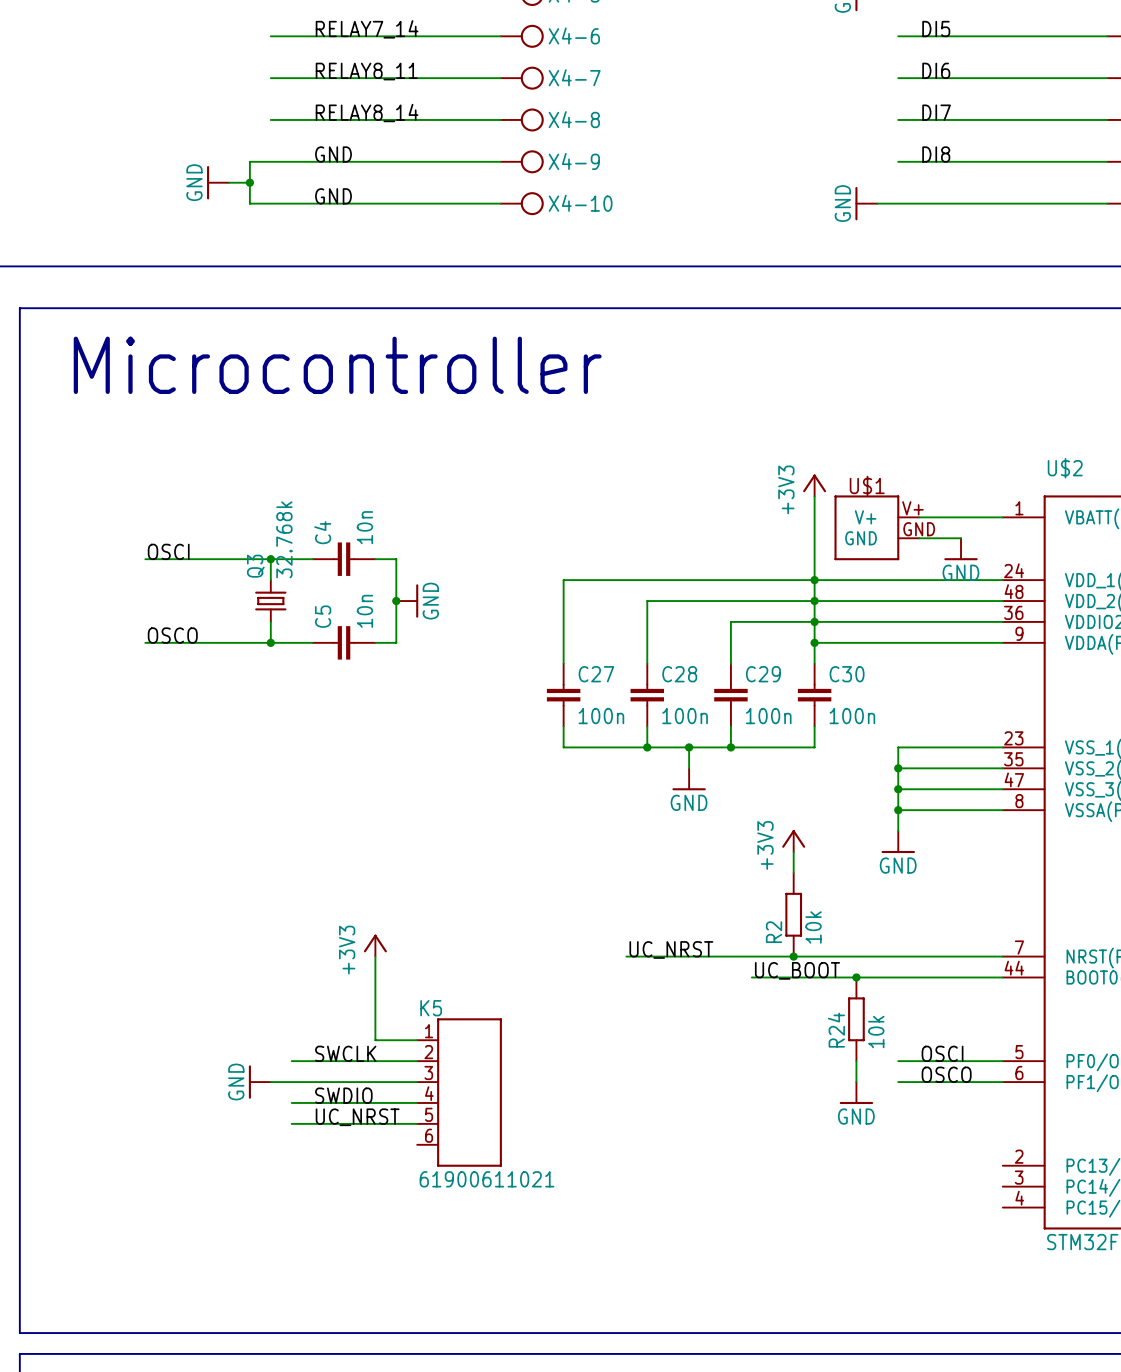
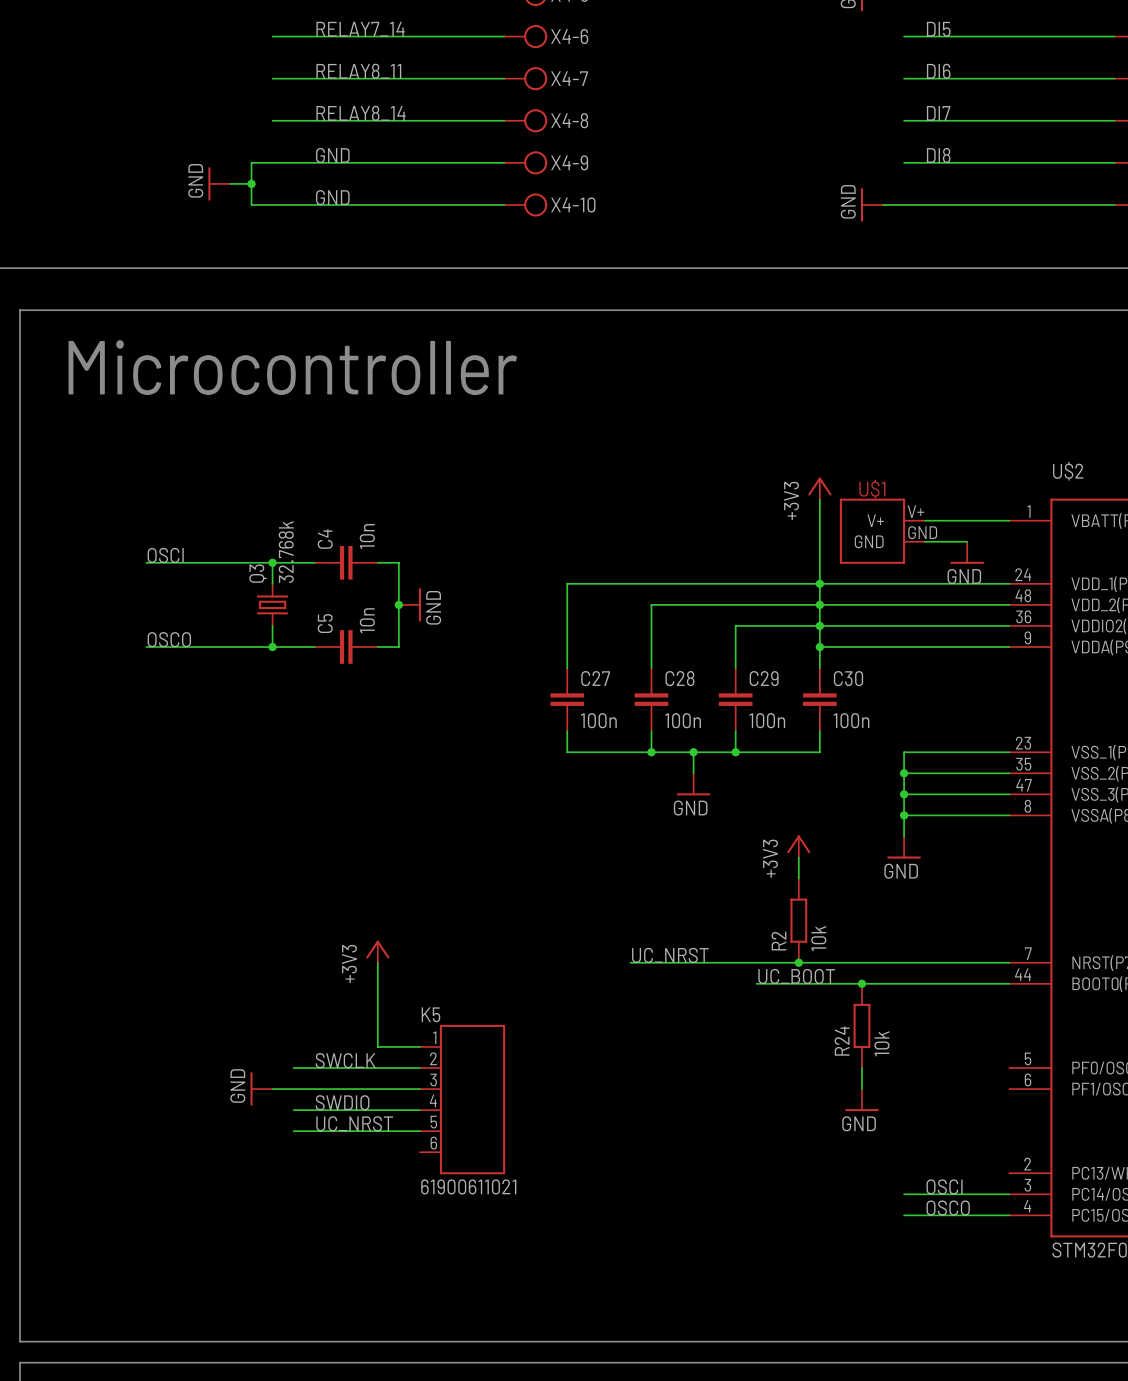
label position: OSCI (942, 1053) -> OSCI (944, 1186)
wire: (898, 1061) (1002, 1061) -> (904, 1215) (1009, 1215)
label position: OSCO (946, 1074) -> OSCO (948, 1208)
wire: (898, 1082) (1002, 1082) -> (904, 1194) (1009, 1194)

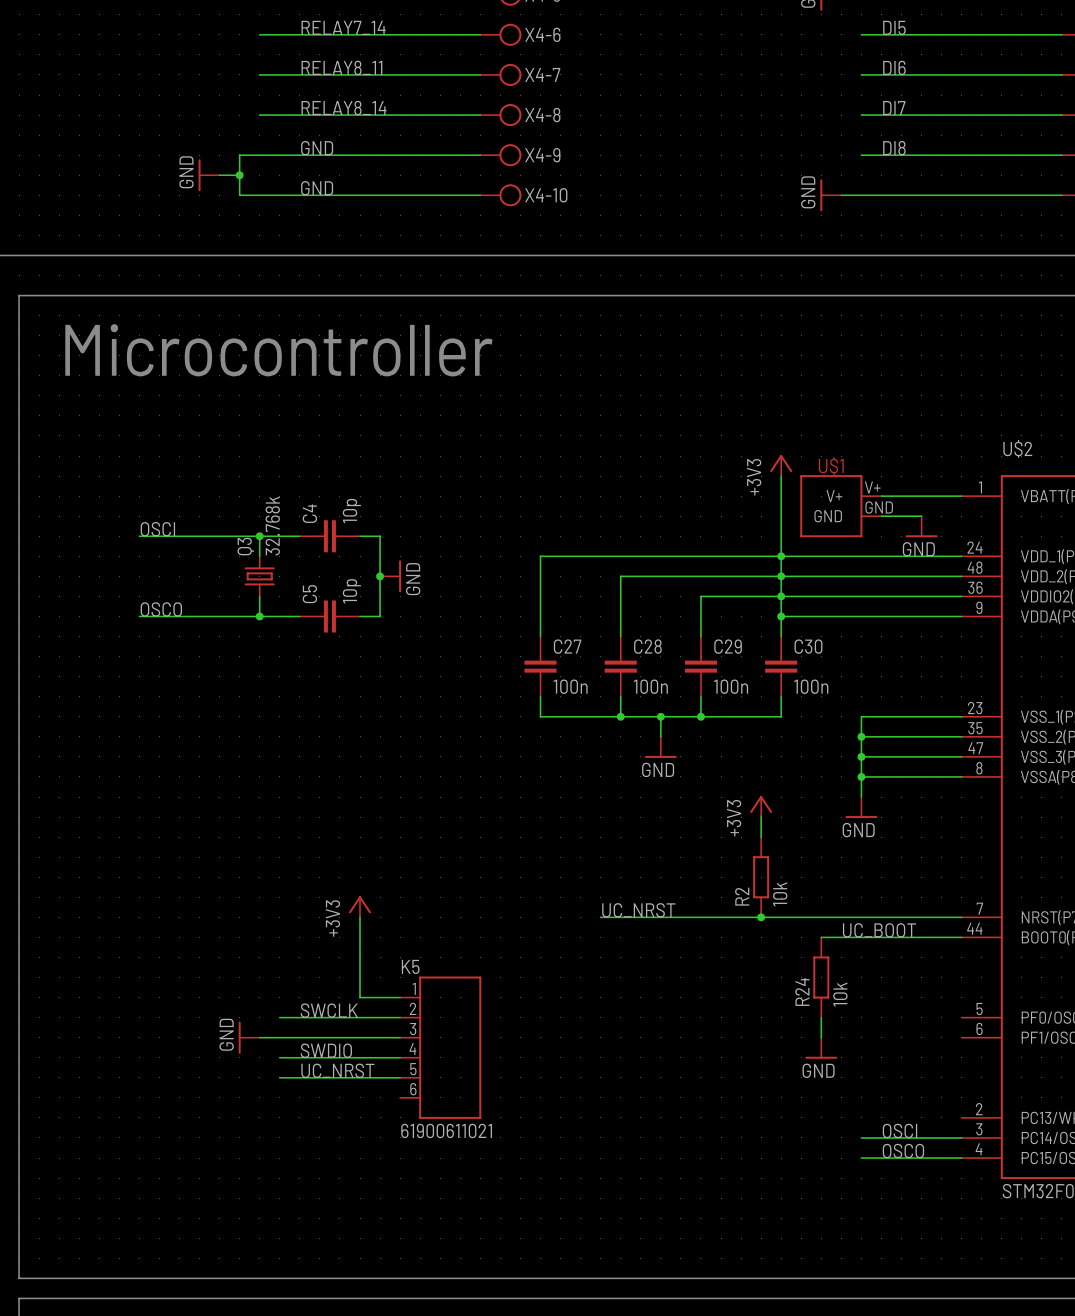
C4 value: 10n (367, 536) -> 10p (351, 511)
C5 value: 10n (367, 620) -> 10p (351, 591)
label position: UC_BOOT (796, 976) -> UC_BOOT (879, 930)
wire: (756, 983) (861, 983) -> none
junction: (861, 983) -> none

